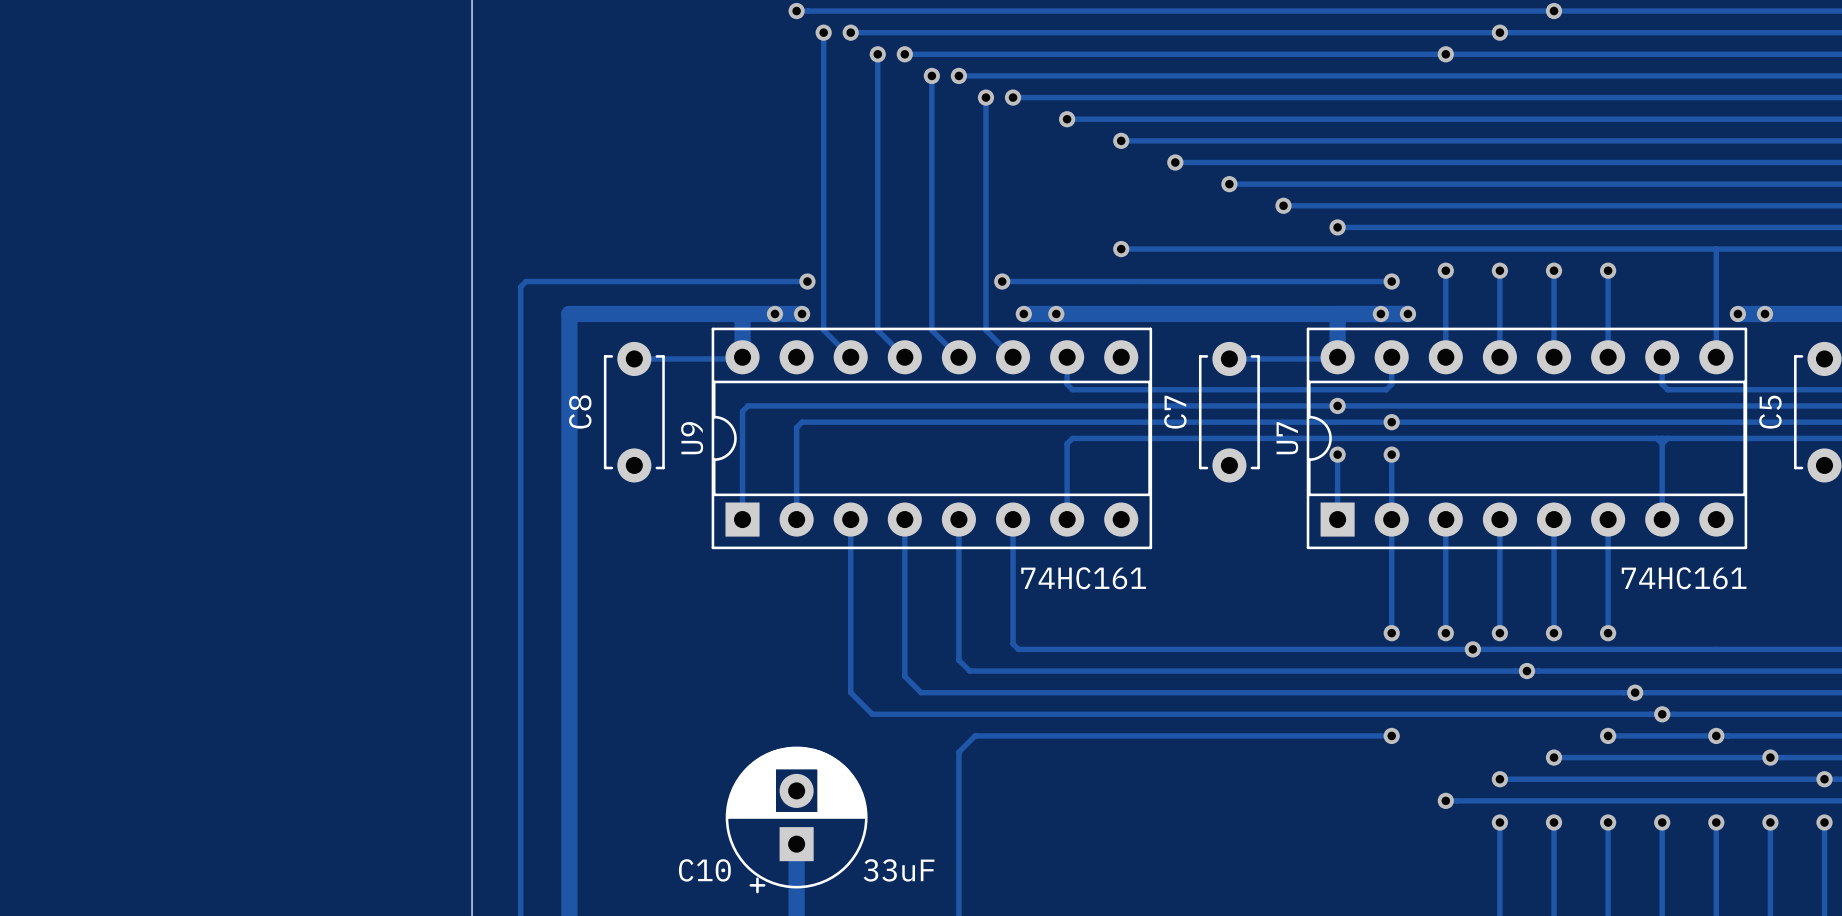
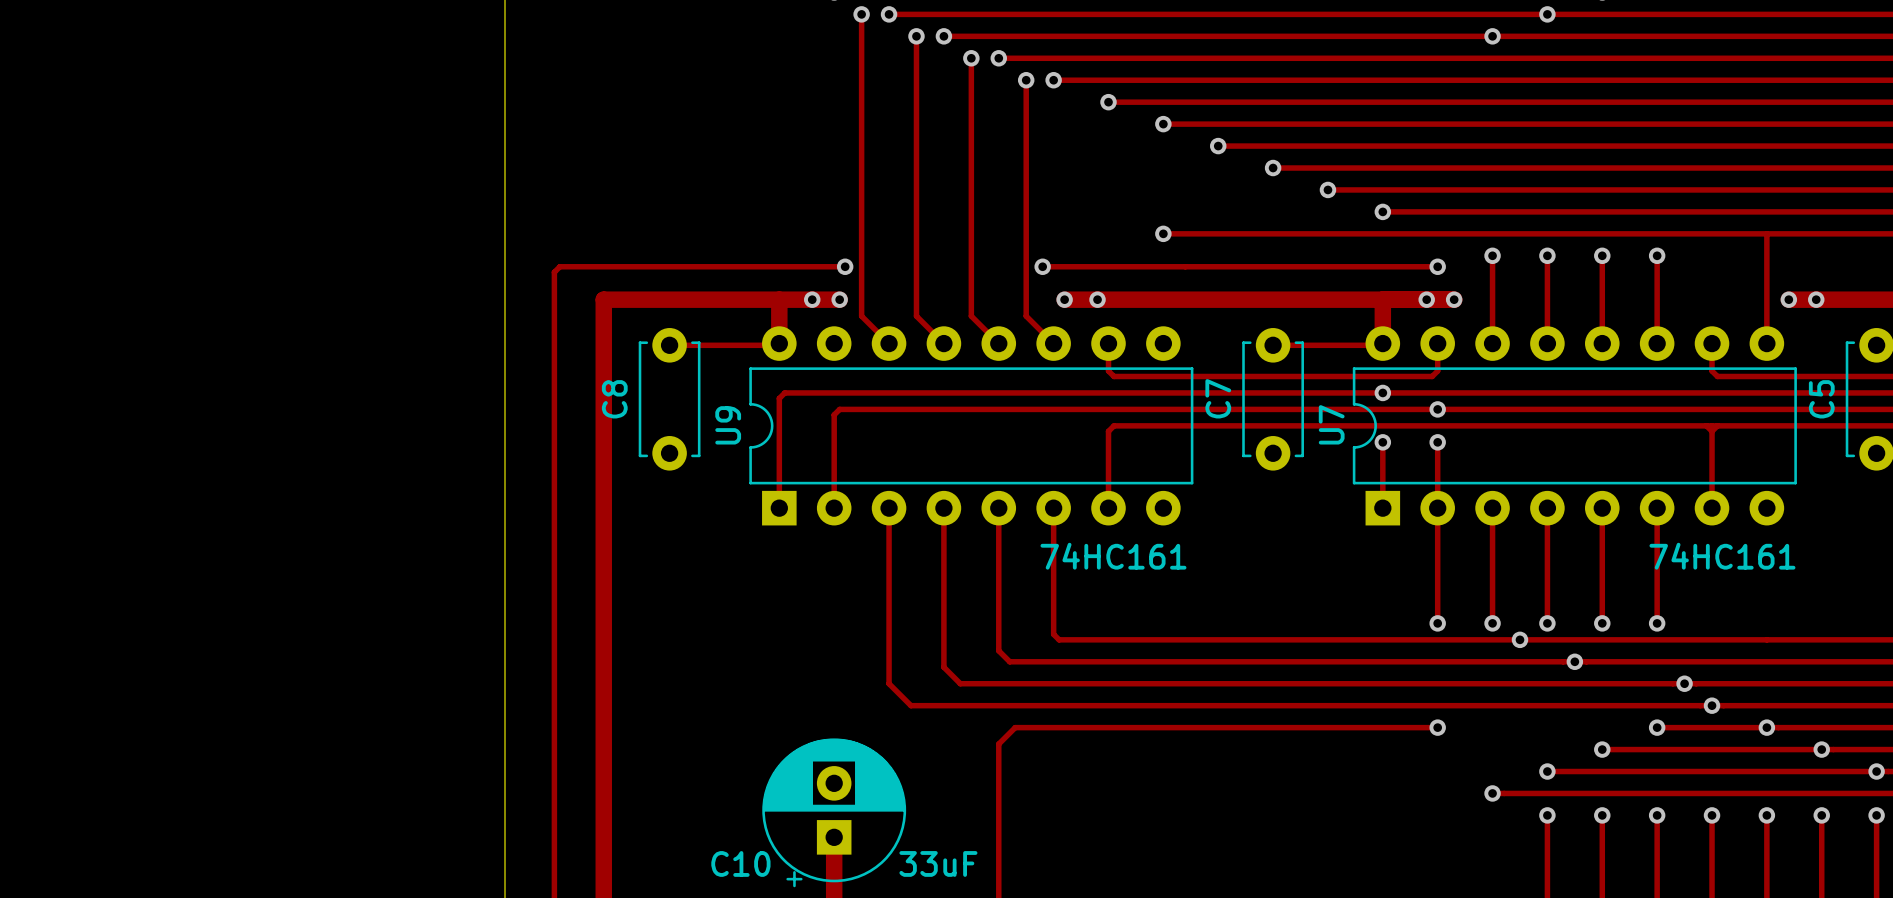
U9 footprint: [711, 327, 1153, 550] -> [749, 326, 1194, 526]
U7 footprint: [1306, 327, 1748, 550] -> [1352, 326, 1797, 526]

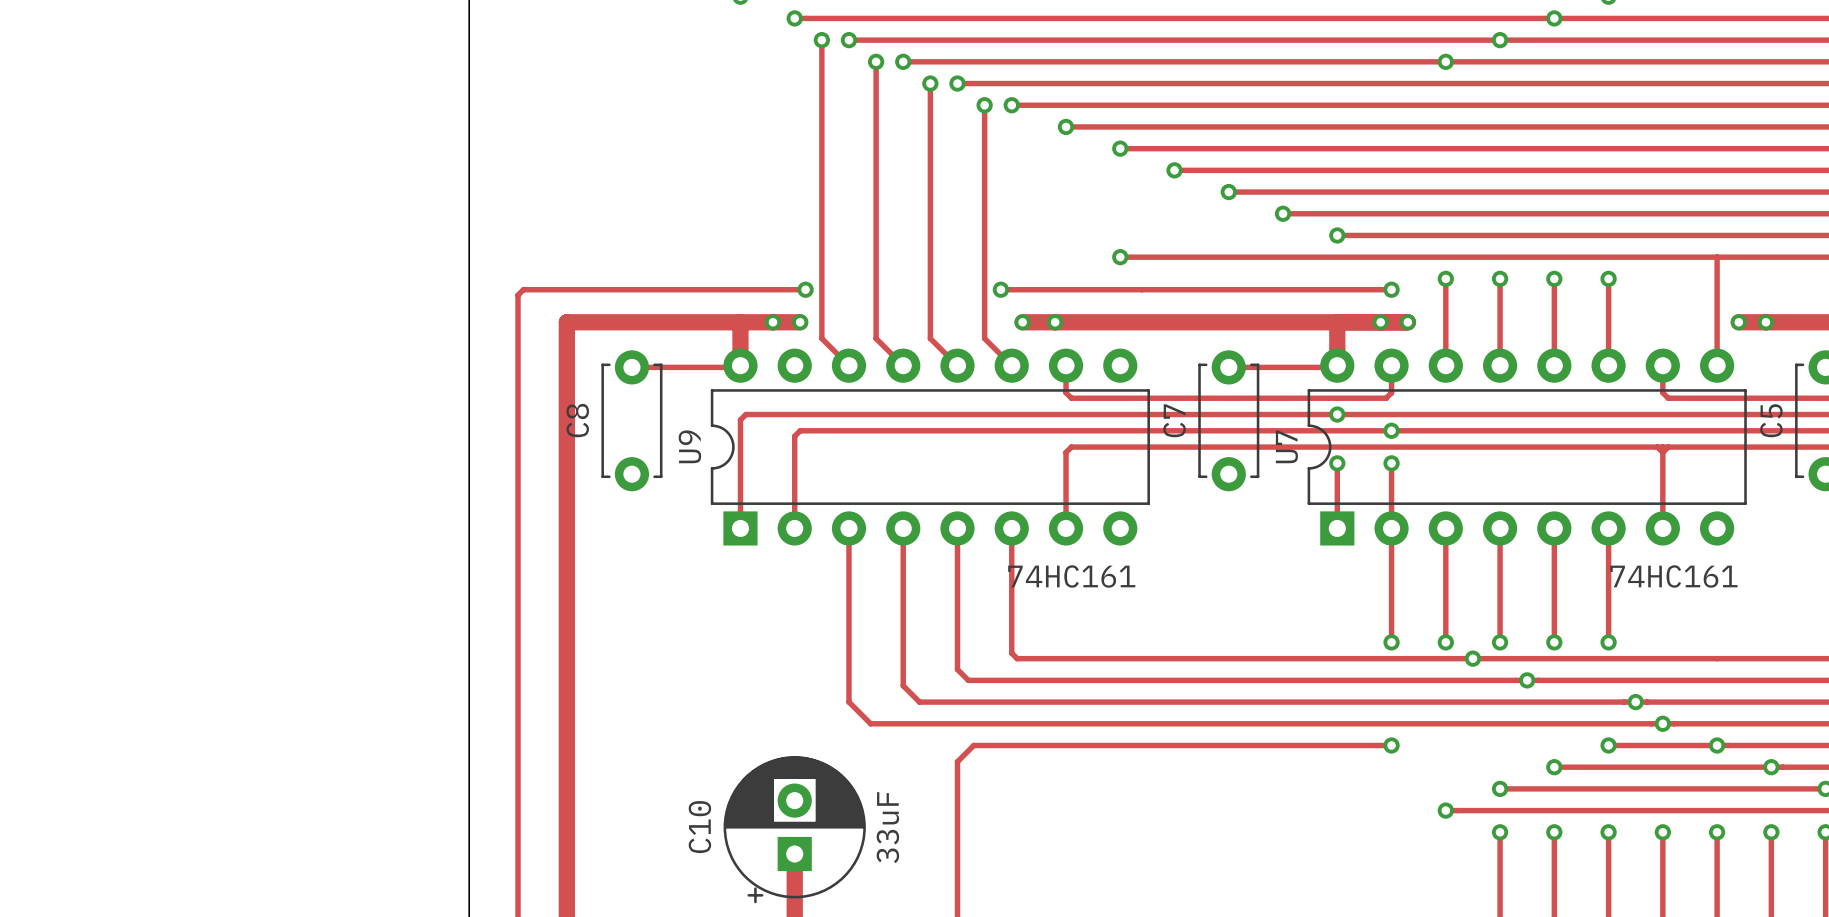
C10 name rotation: 0° (740, 863) -> 90° counterclockwise (699, 827)
C10 value rotation: 0° (938, 863) -> 90° counterclockwise (887, 827)

